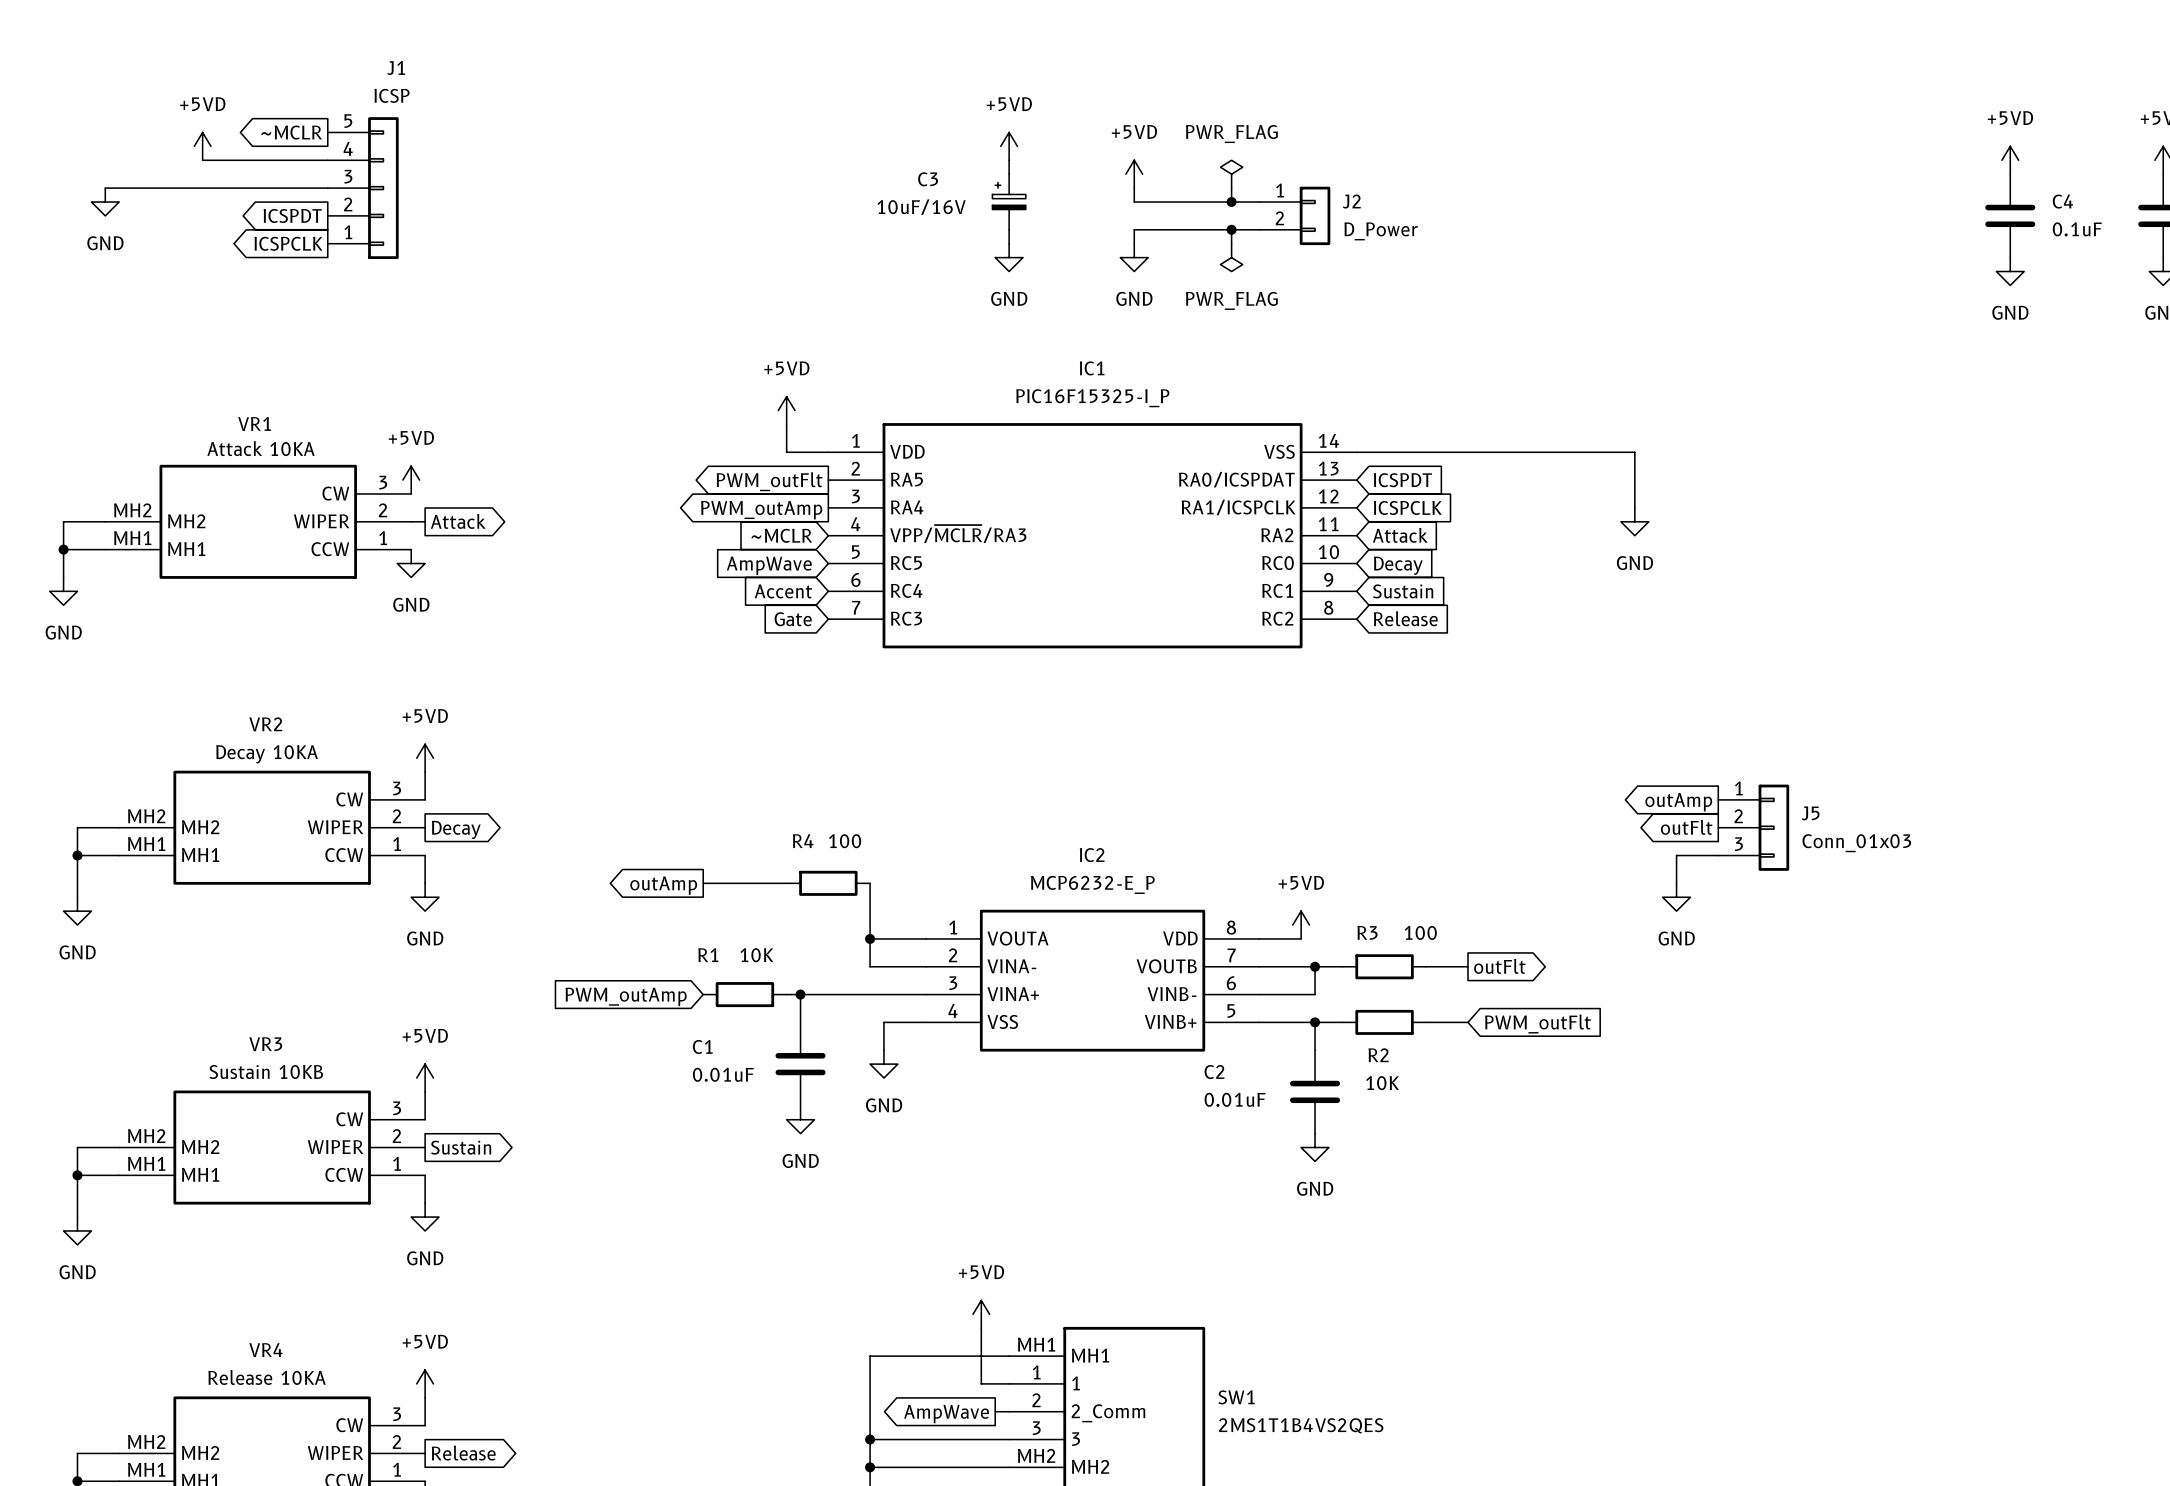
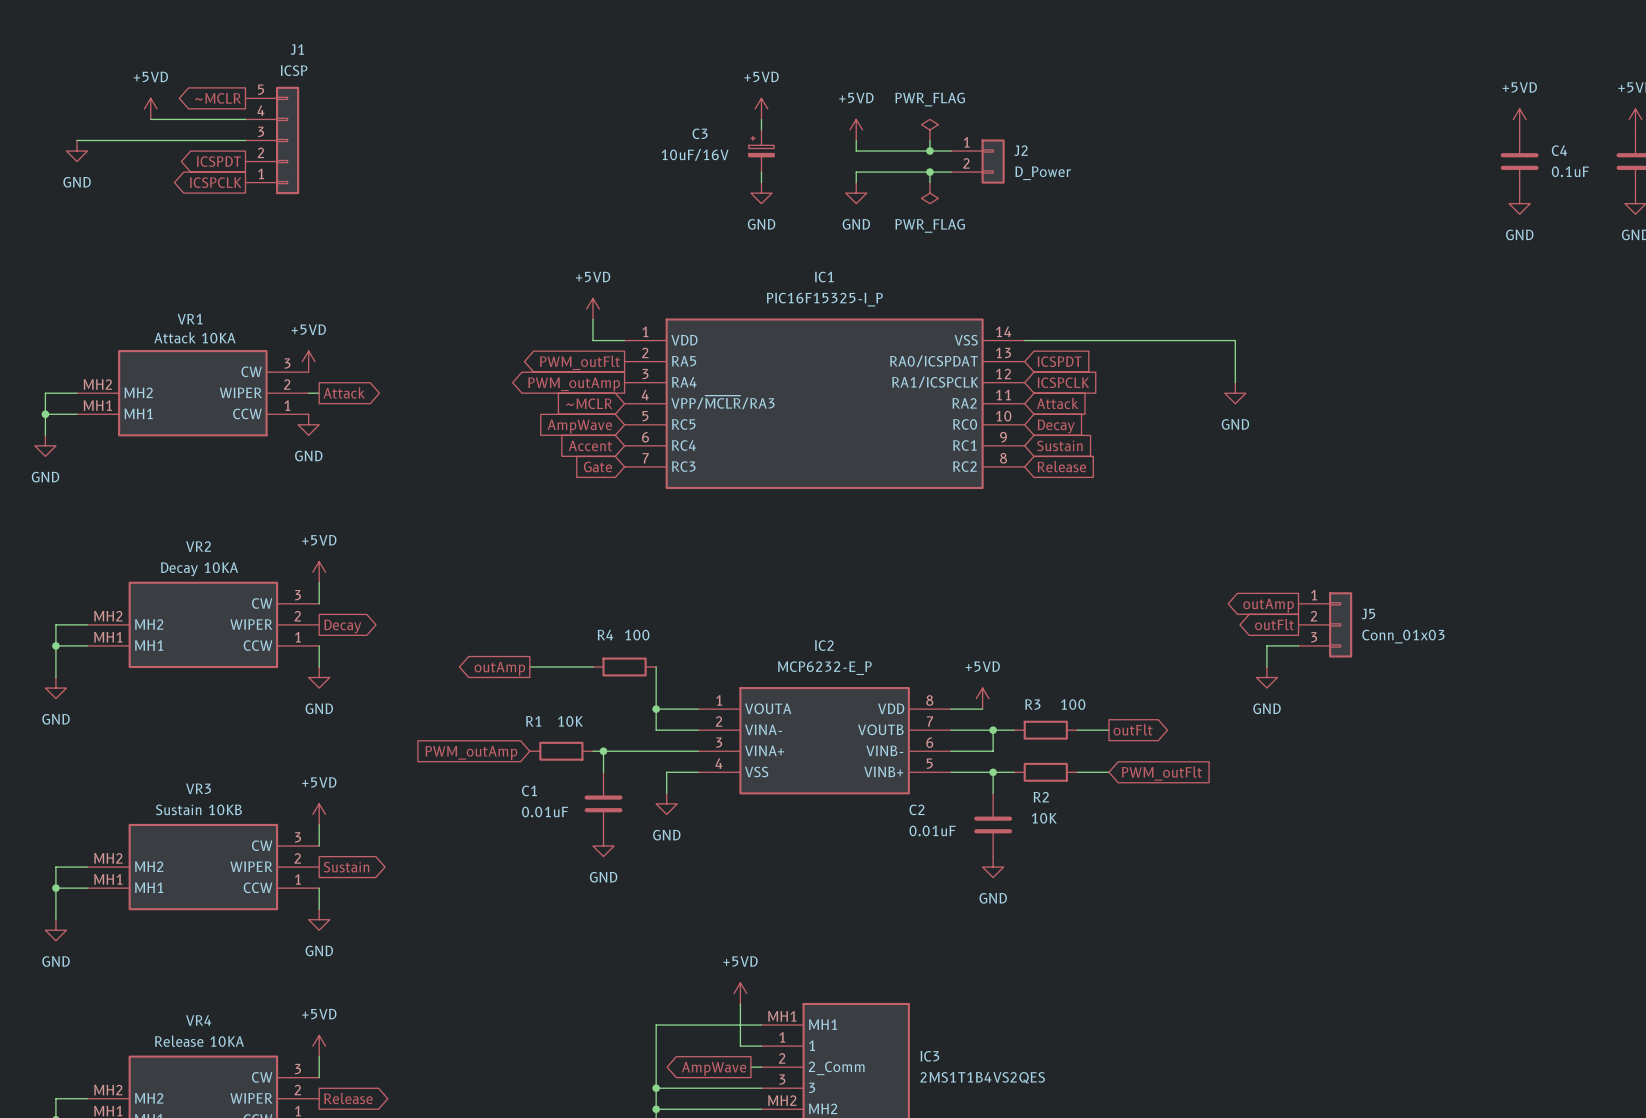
SW1 name: SW1 (1236, 1397) -> IC3 (929, 1056)

